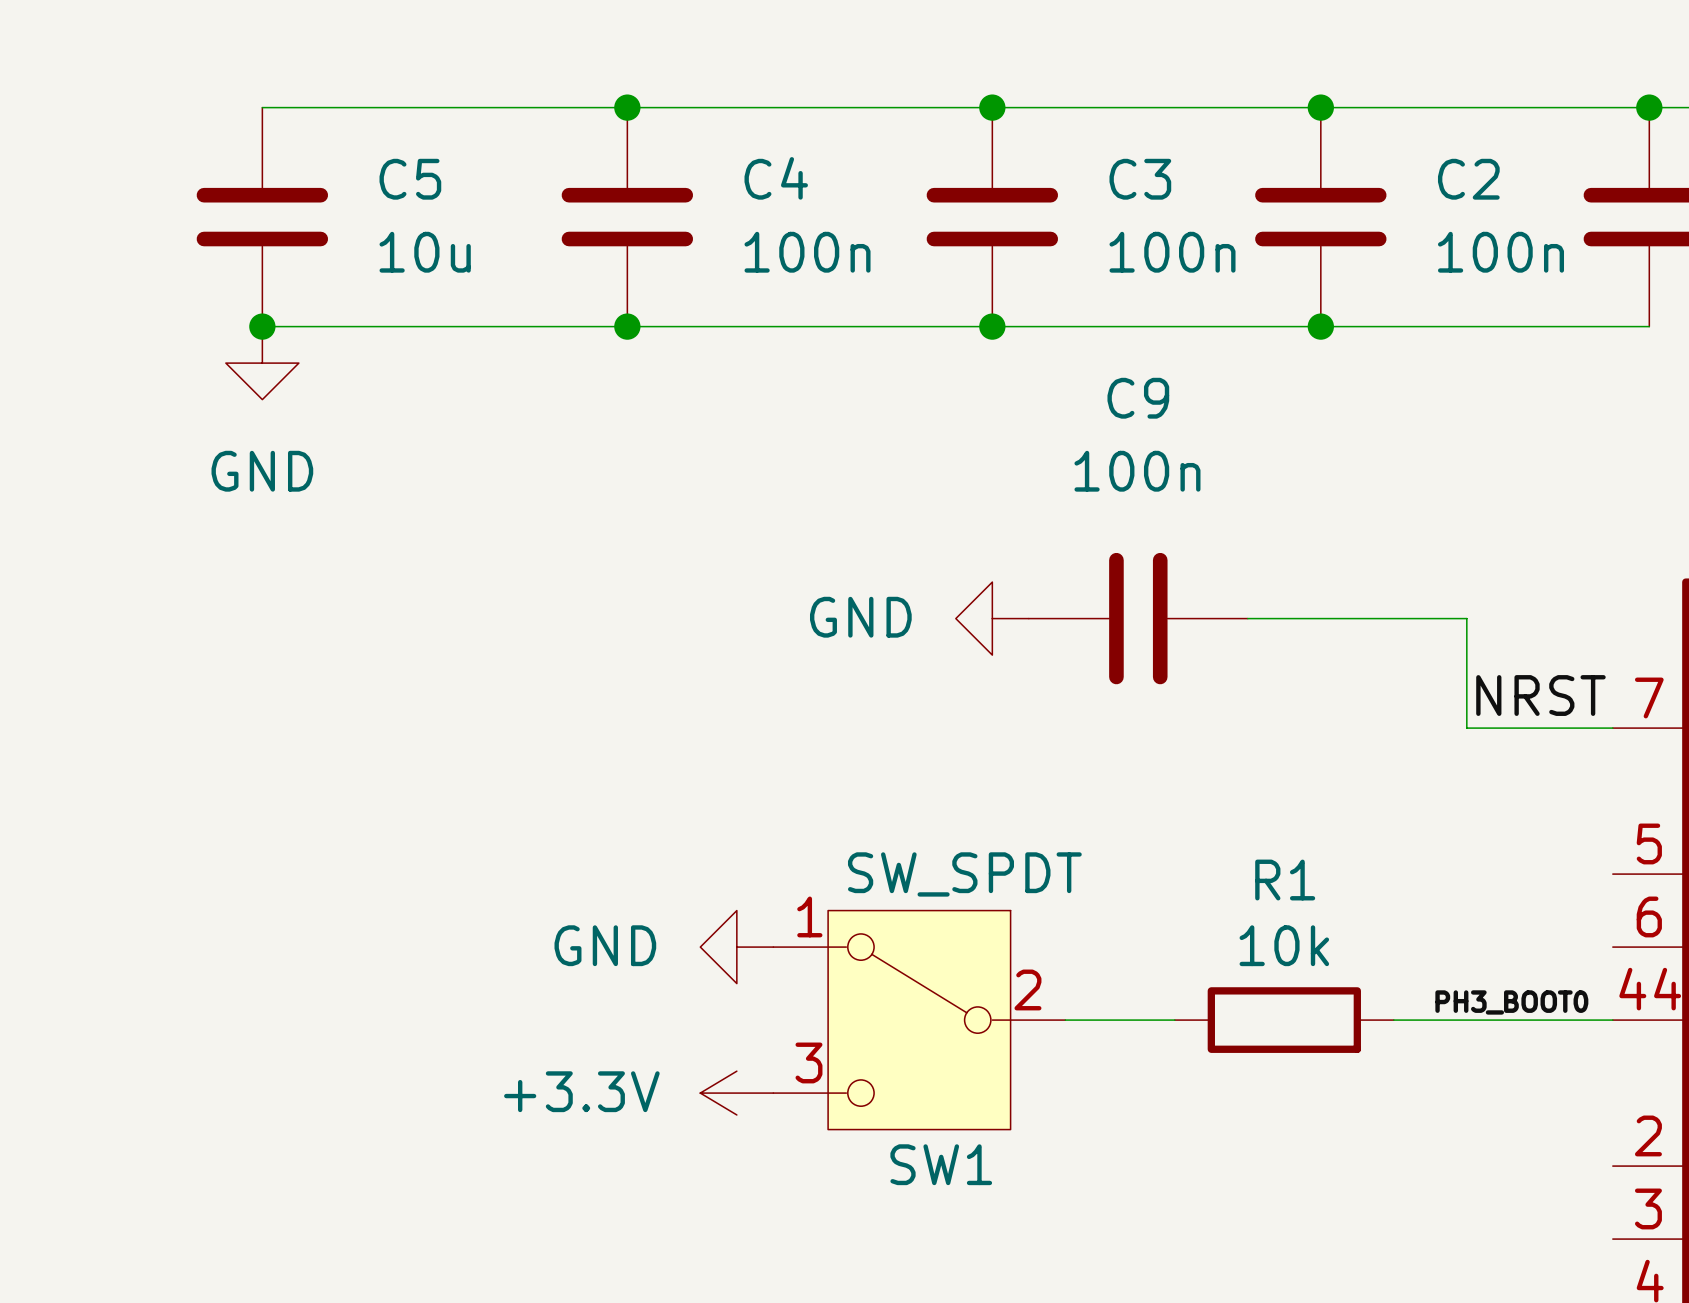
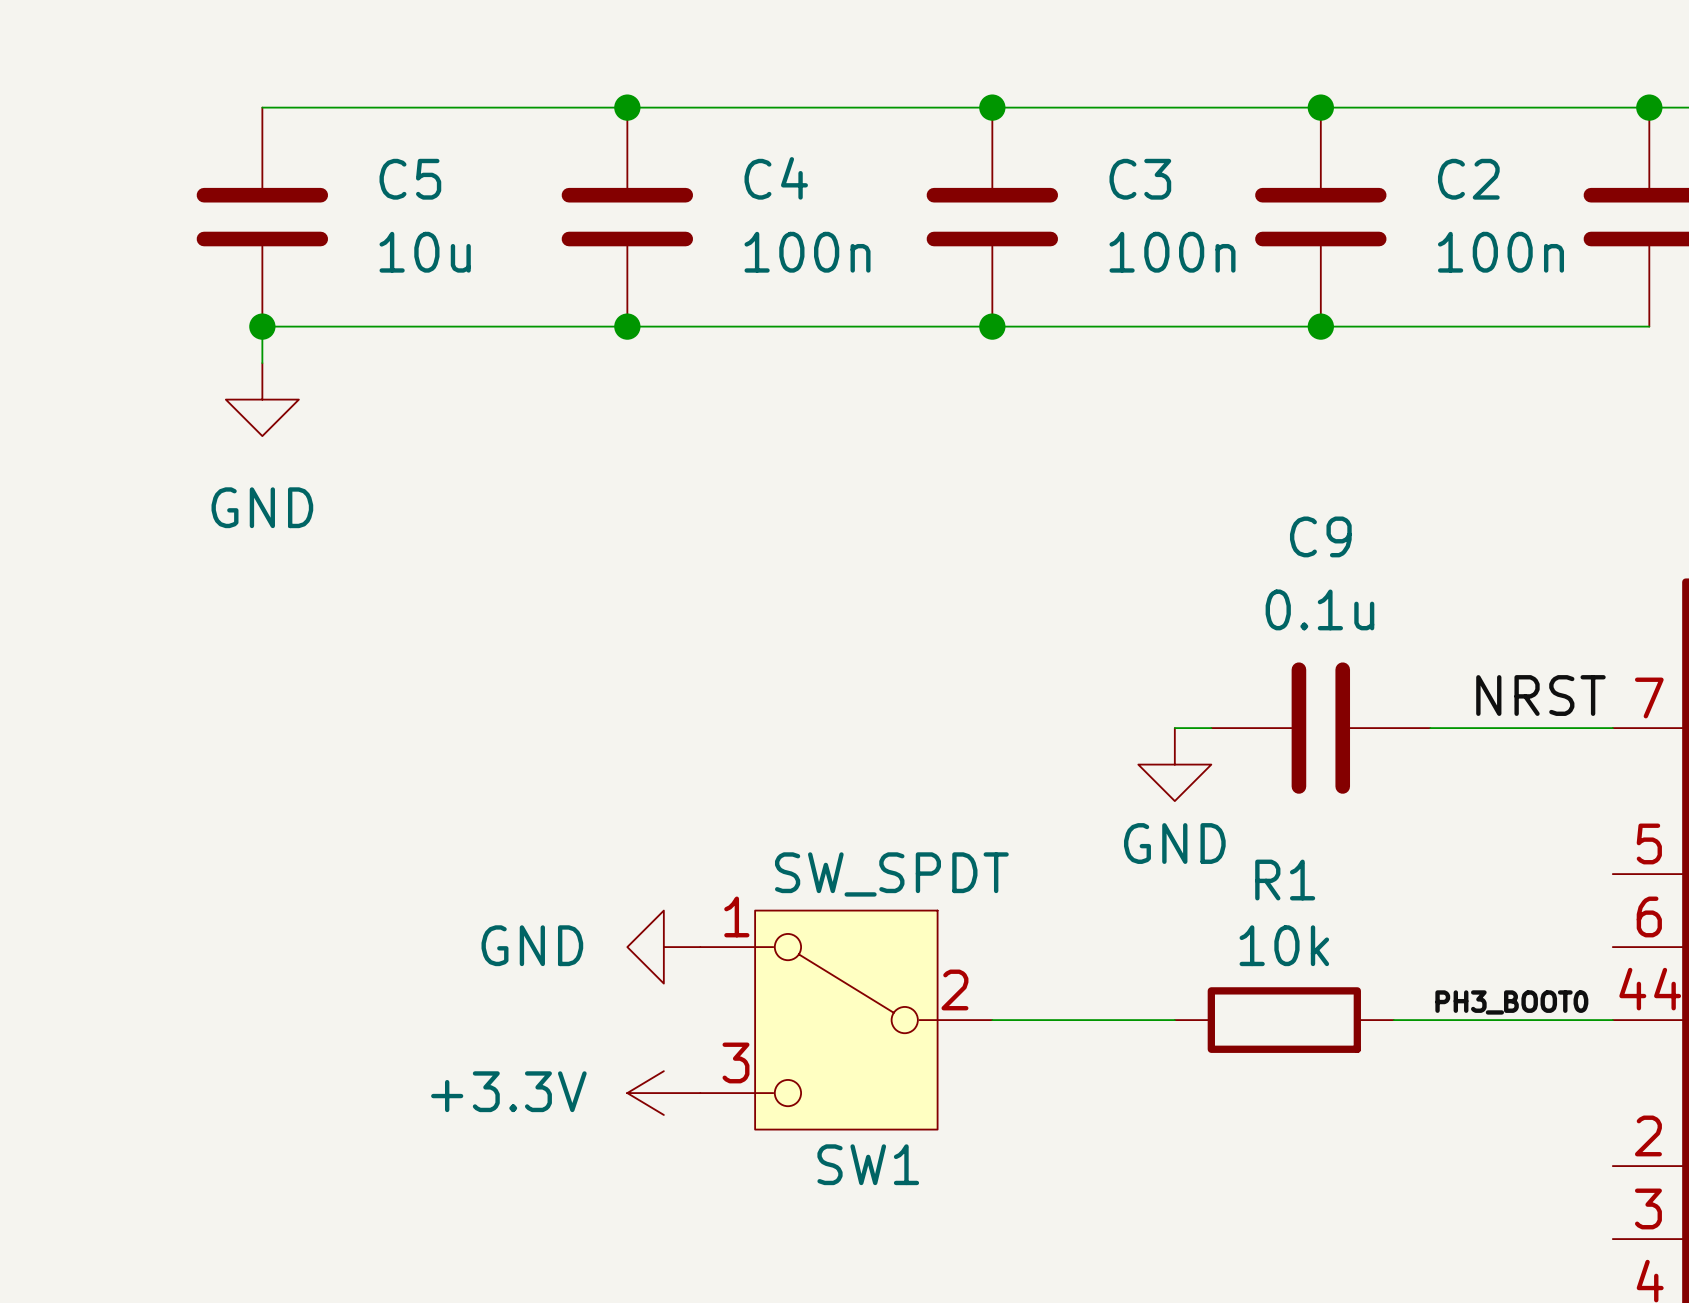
power symbol position: GND (262, 363) -> GND (262, 399)
C9 name position: C9 (1138, 398) -> C9 (1320, 536)
C9 value: 100n (1137, 471) -> 0.1u (1319, 609)
power symbol: GND (992, 618) -> none
C9 position: (1138, 618) -> (1320, 728)
wire: (1247, 618) (1466, 618) (1466, 728) -> (1430, 728) (1466, 728)
wire: none -> (1174, 728) (1211, 728)
power symbol: none -> GND (1174, 764)
power symbol position: GND (736, 947) -> GND (663, 947)
SW1 position: (919, 1020) -> (846, 1020)
power symbol position: +3.3V (736, 1093) -> +3.3V (663, 1093)

